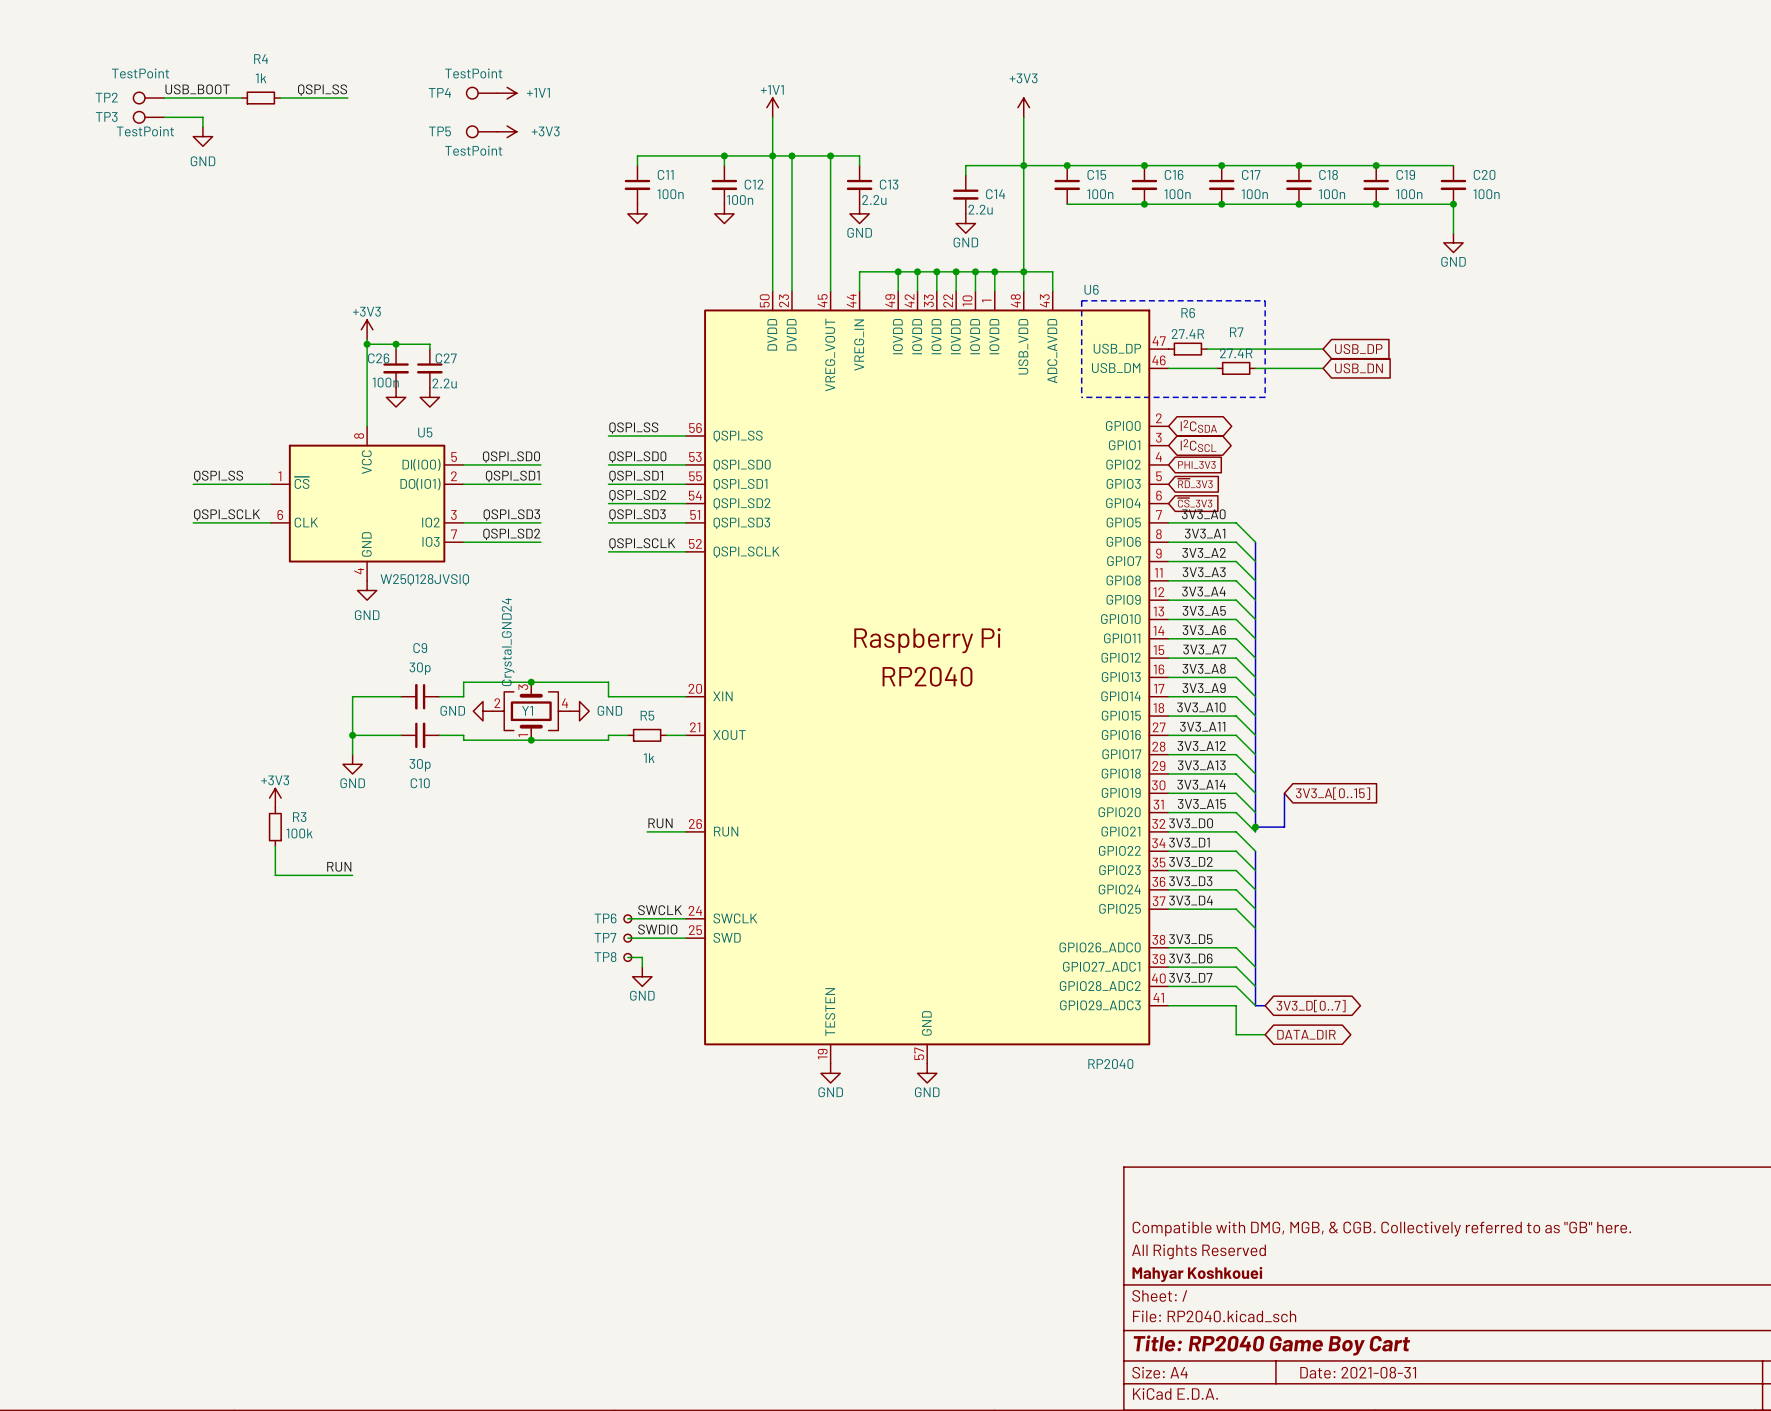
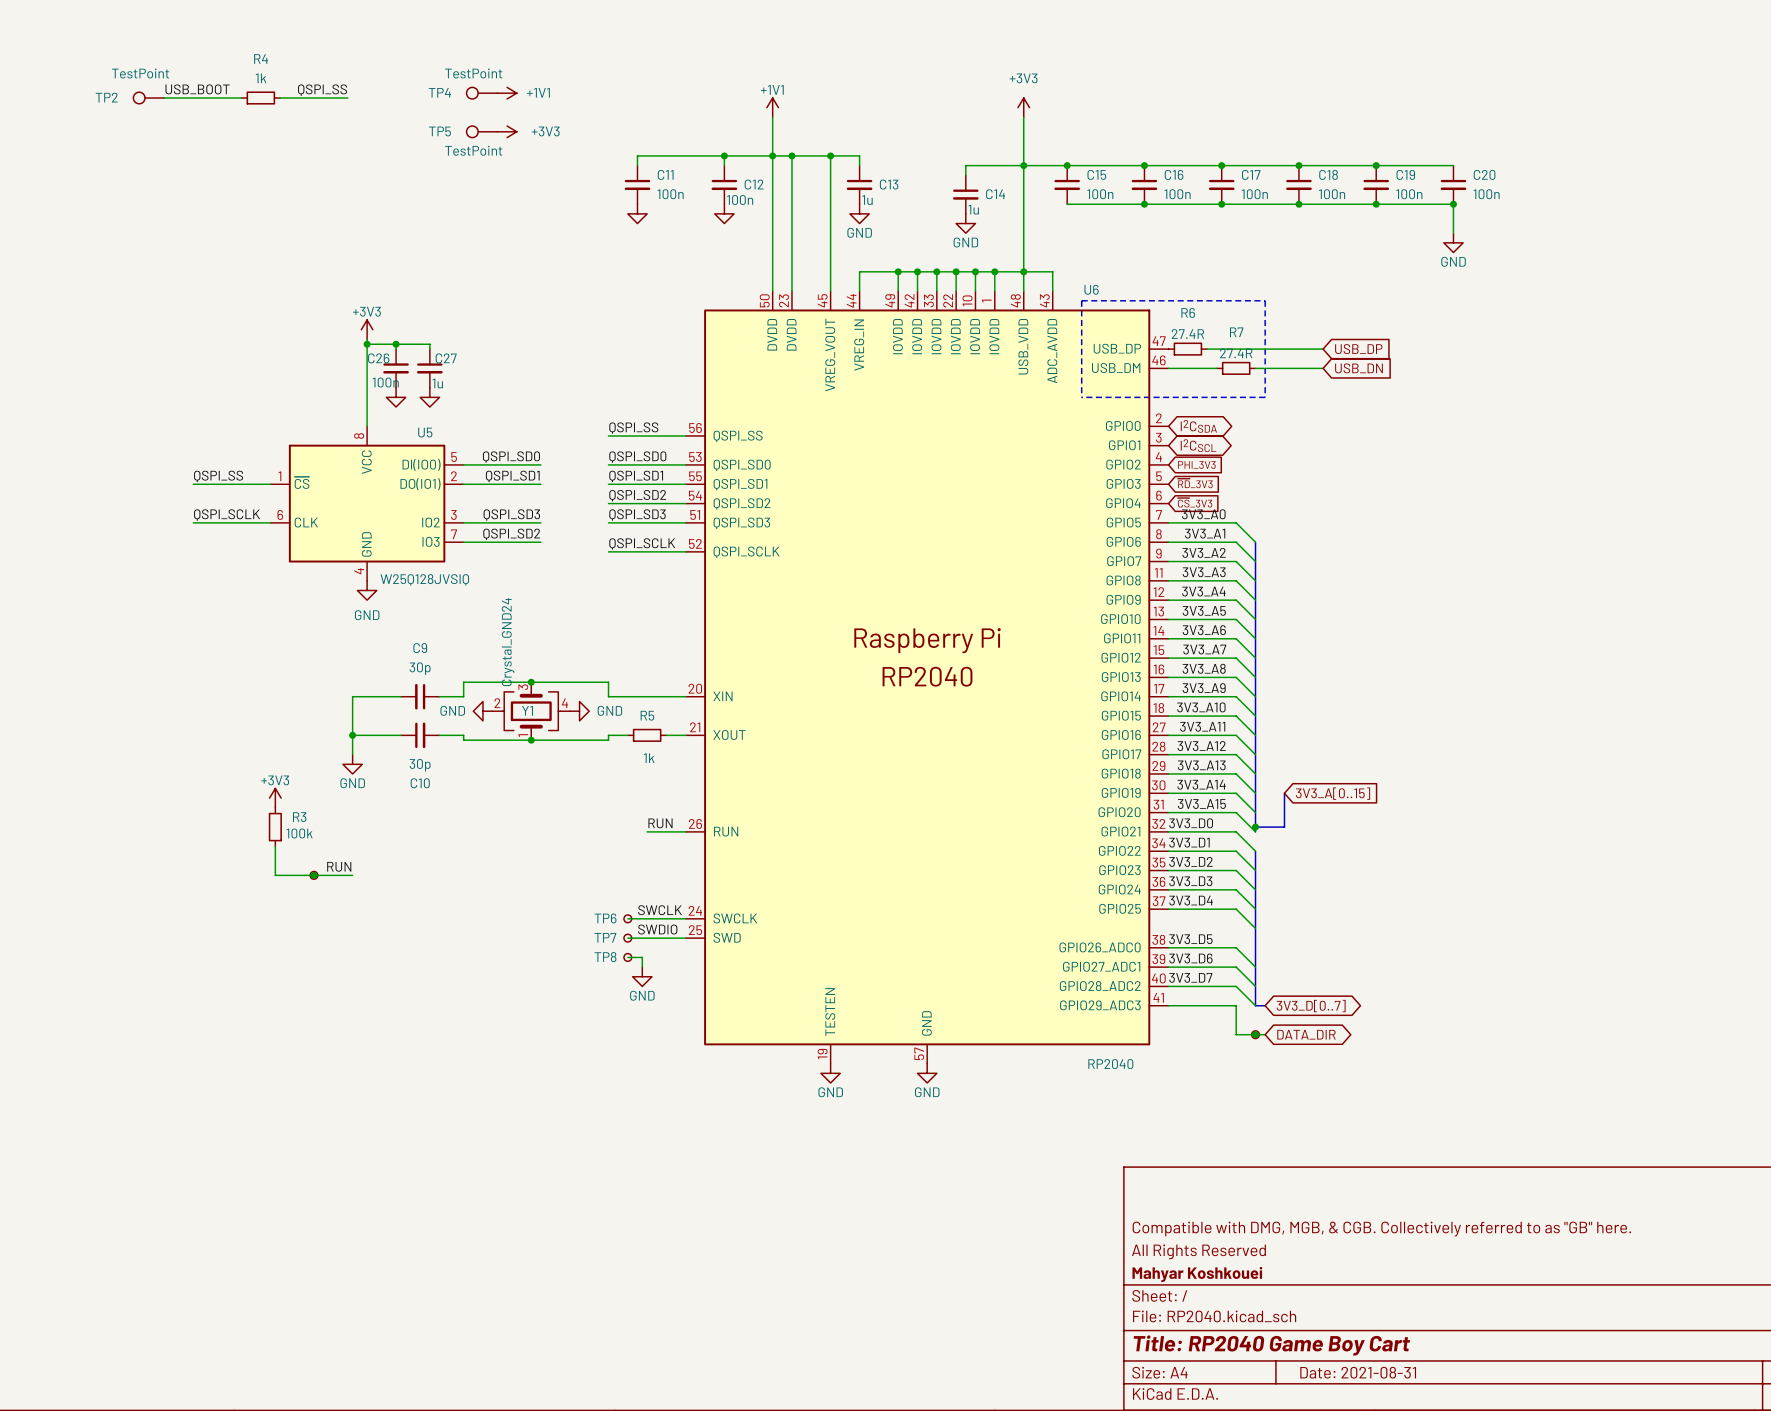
TP3: TestPoint (148, 117) -> none
wire: (164, 117) (202, 117) (202, 126) -> none
power symbol: GND (202, 136) -> none
C13 value: 2.2u (874, 200) -> 1u (867, 200)
C14 value: 2.2u (980, 209) -> 1u (973, 209)
C27 value: 2.2u (444, 383) -> 1u (437, 383)
part: none -> (313, 875)
junction: none -> (313, 875)
part: none -> (1255, 1034)
junction: none -> (1255, 1034)

